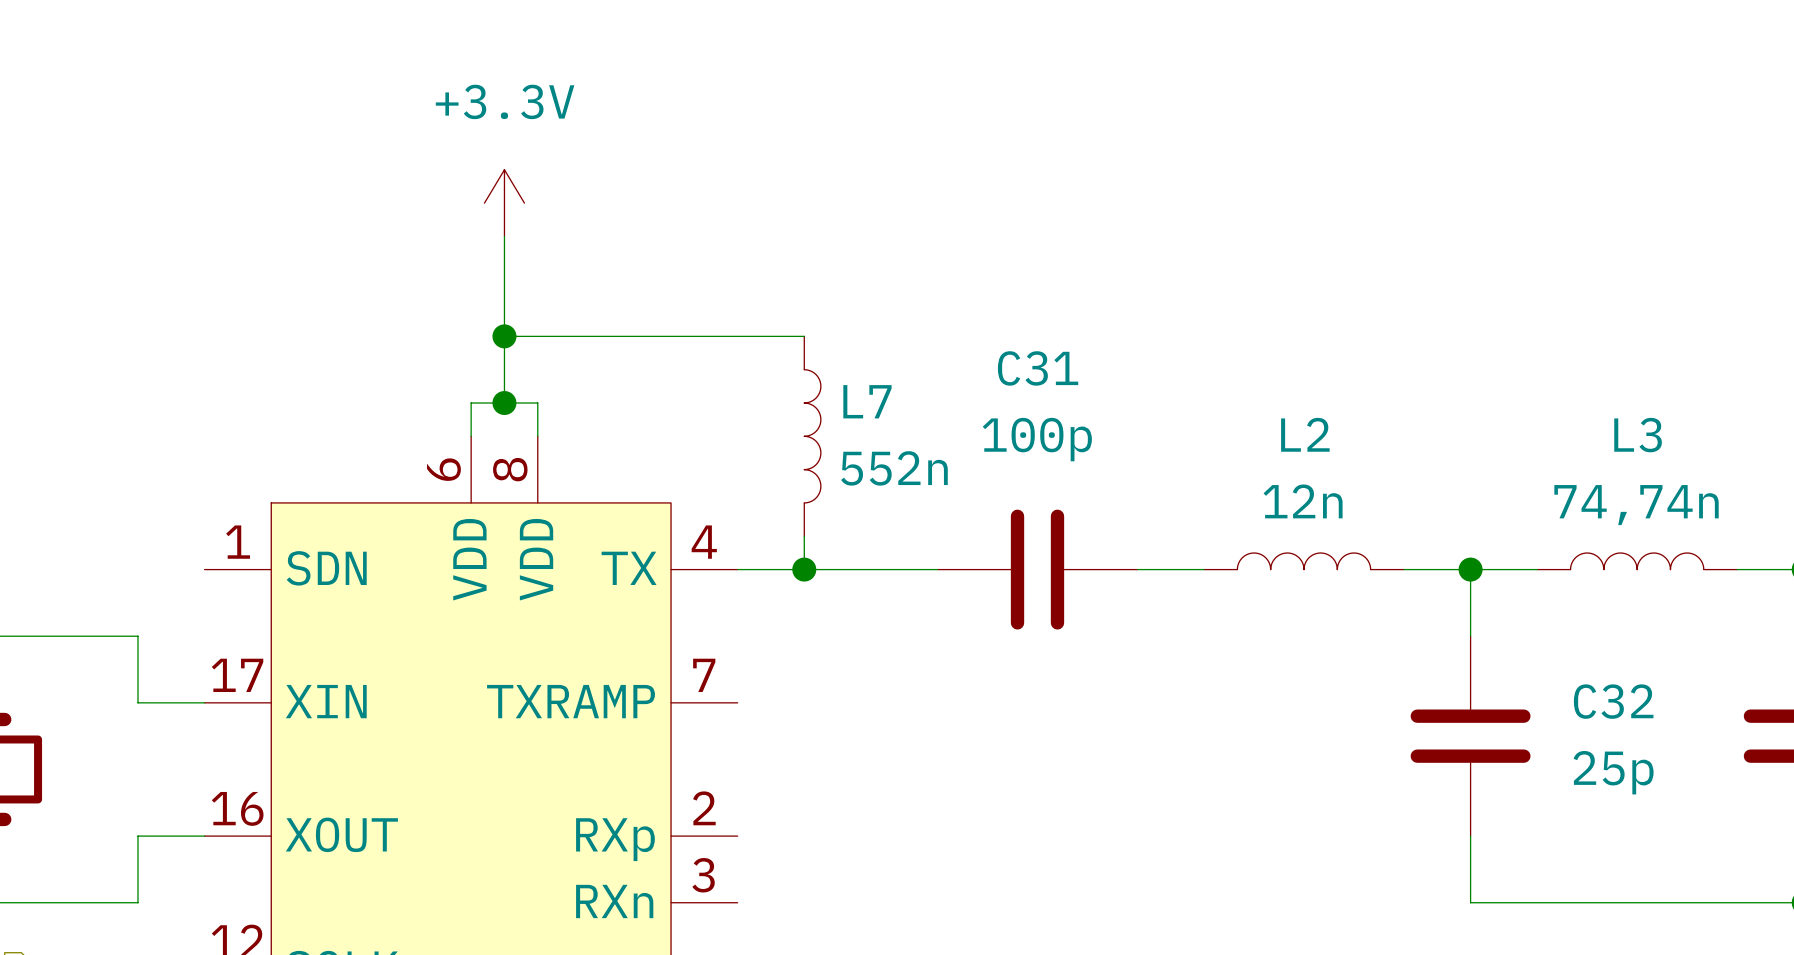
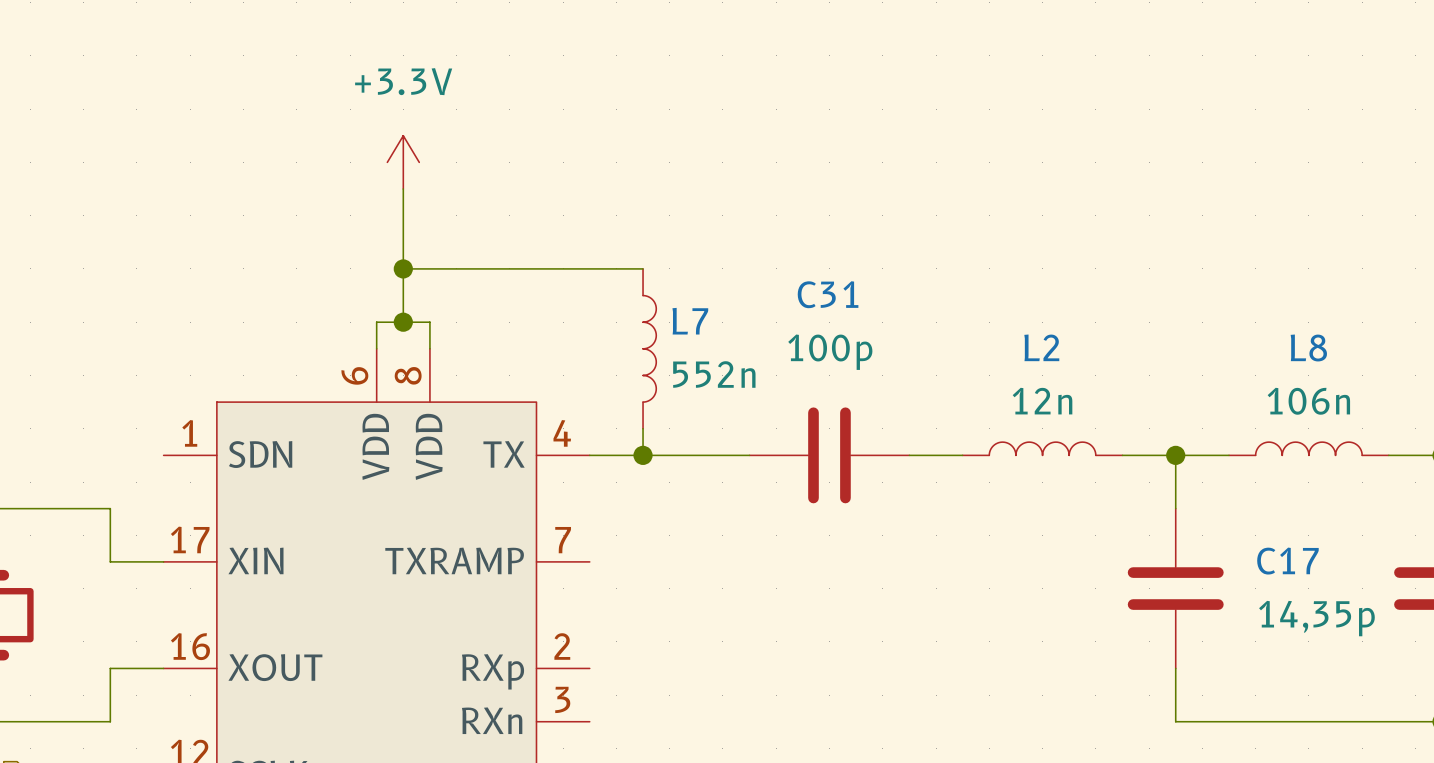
L3 name: L3 (1638, 435) -> L8 (1308, 347)
L3 value: 74,74n (1636, 505) -> 106n (1308, 401)
C32 name: C32 (1613, 701) -> C17 (1287, 561)
C32 value: 25p (1613, 772) -> 14,35p (1316, 618)

